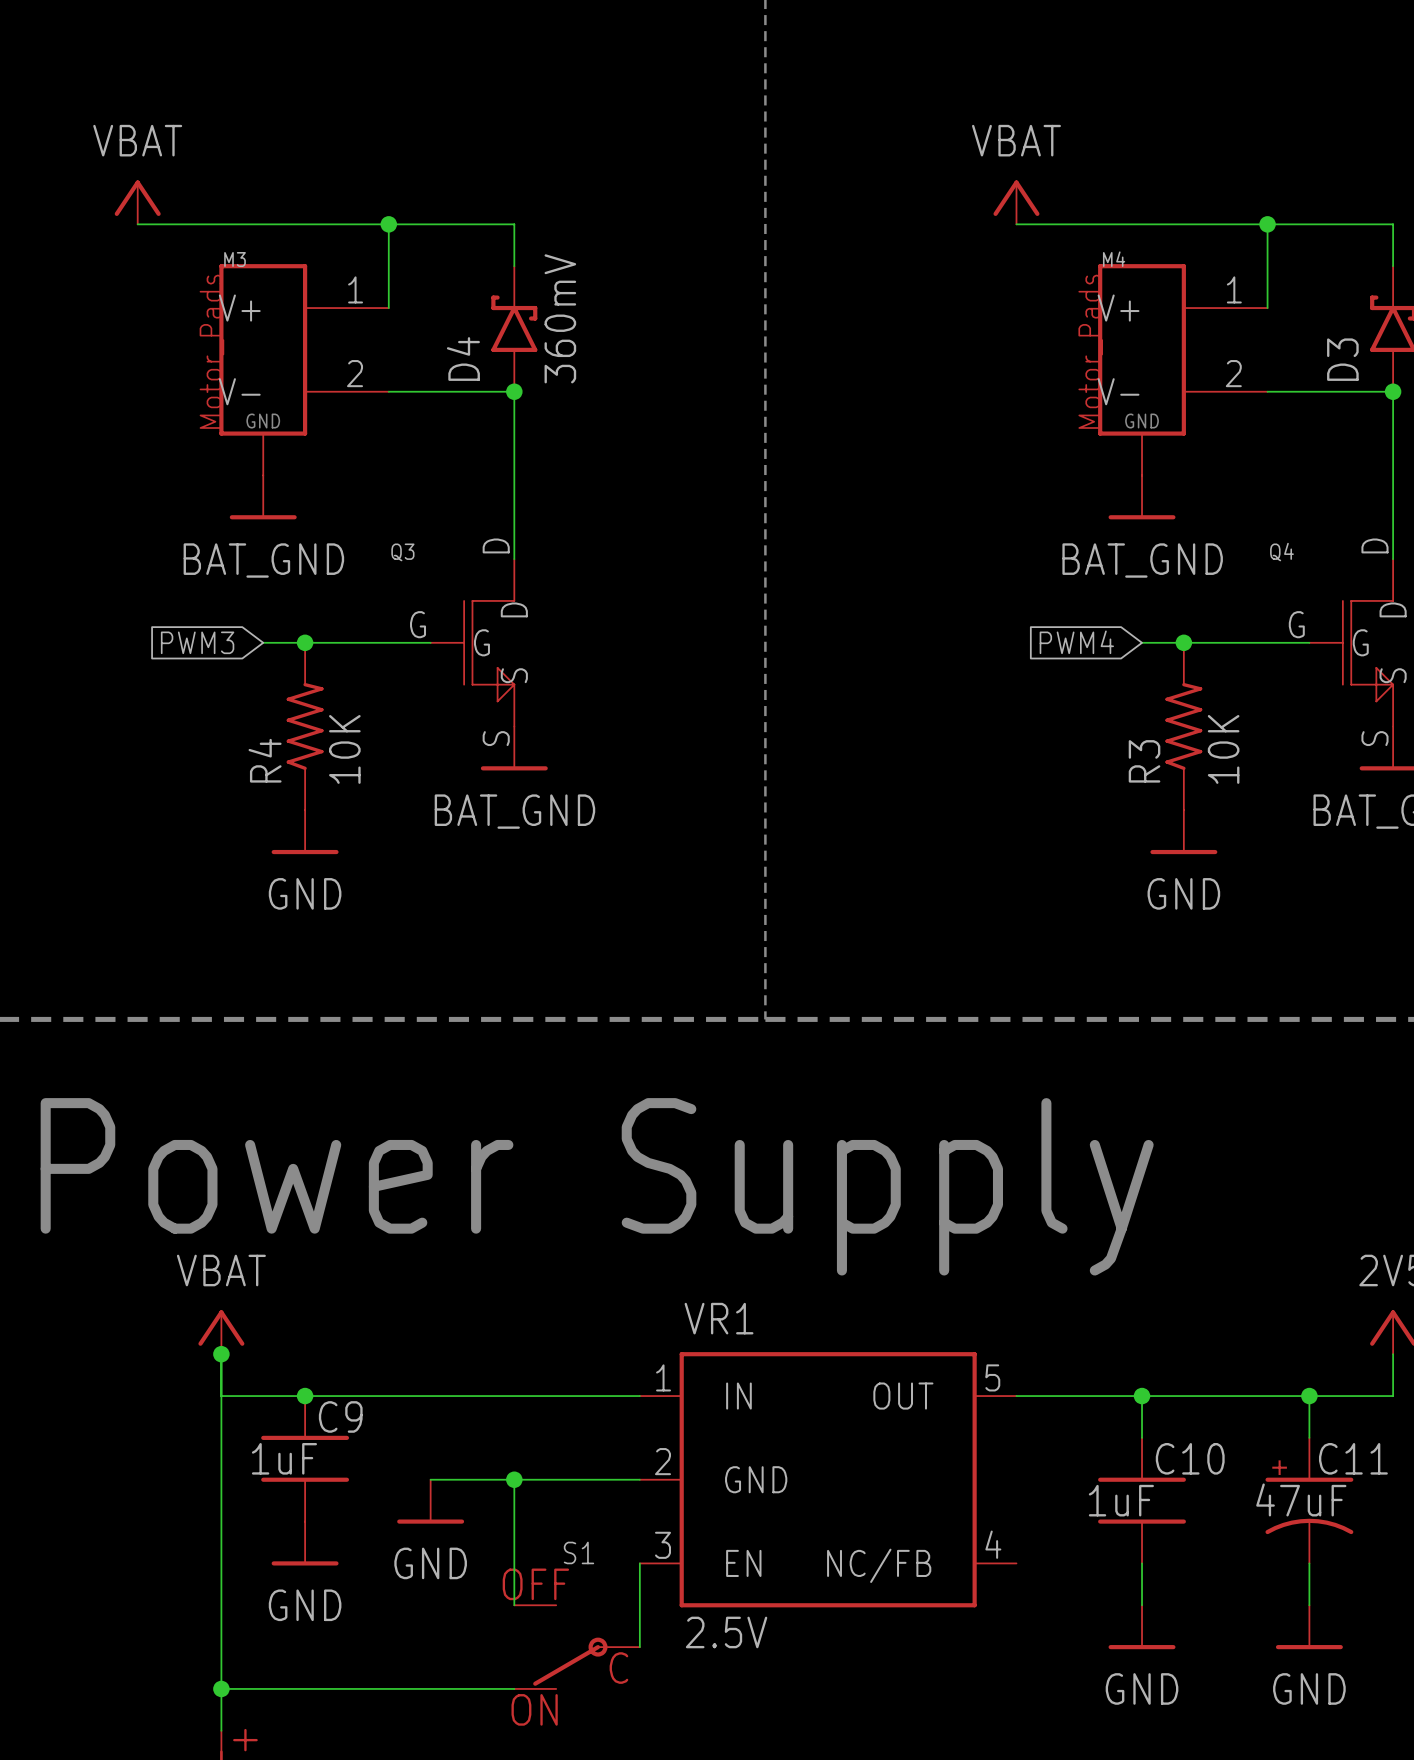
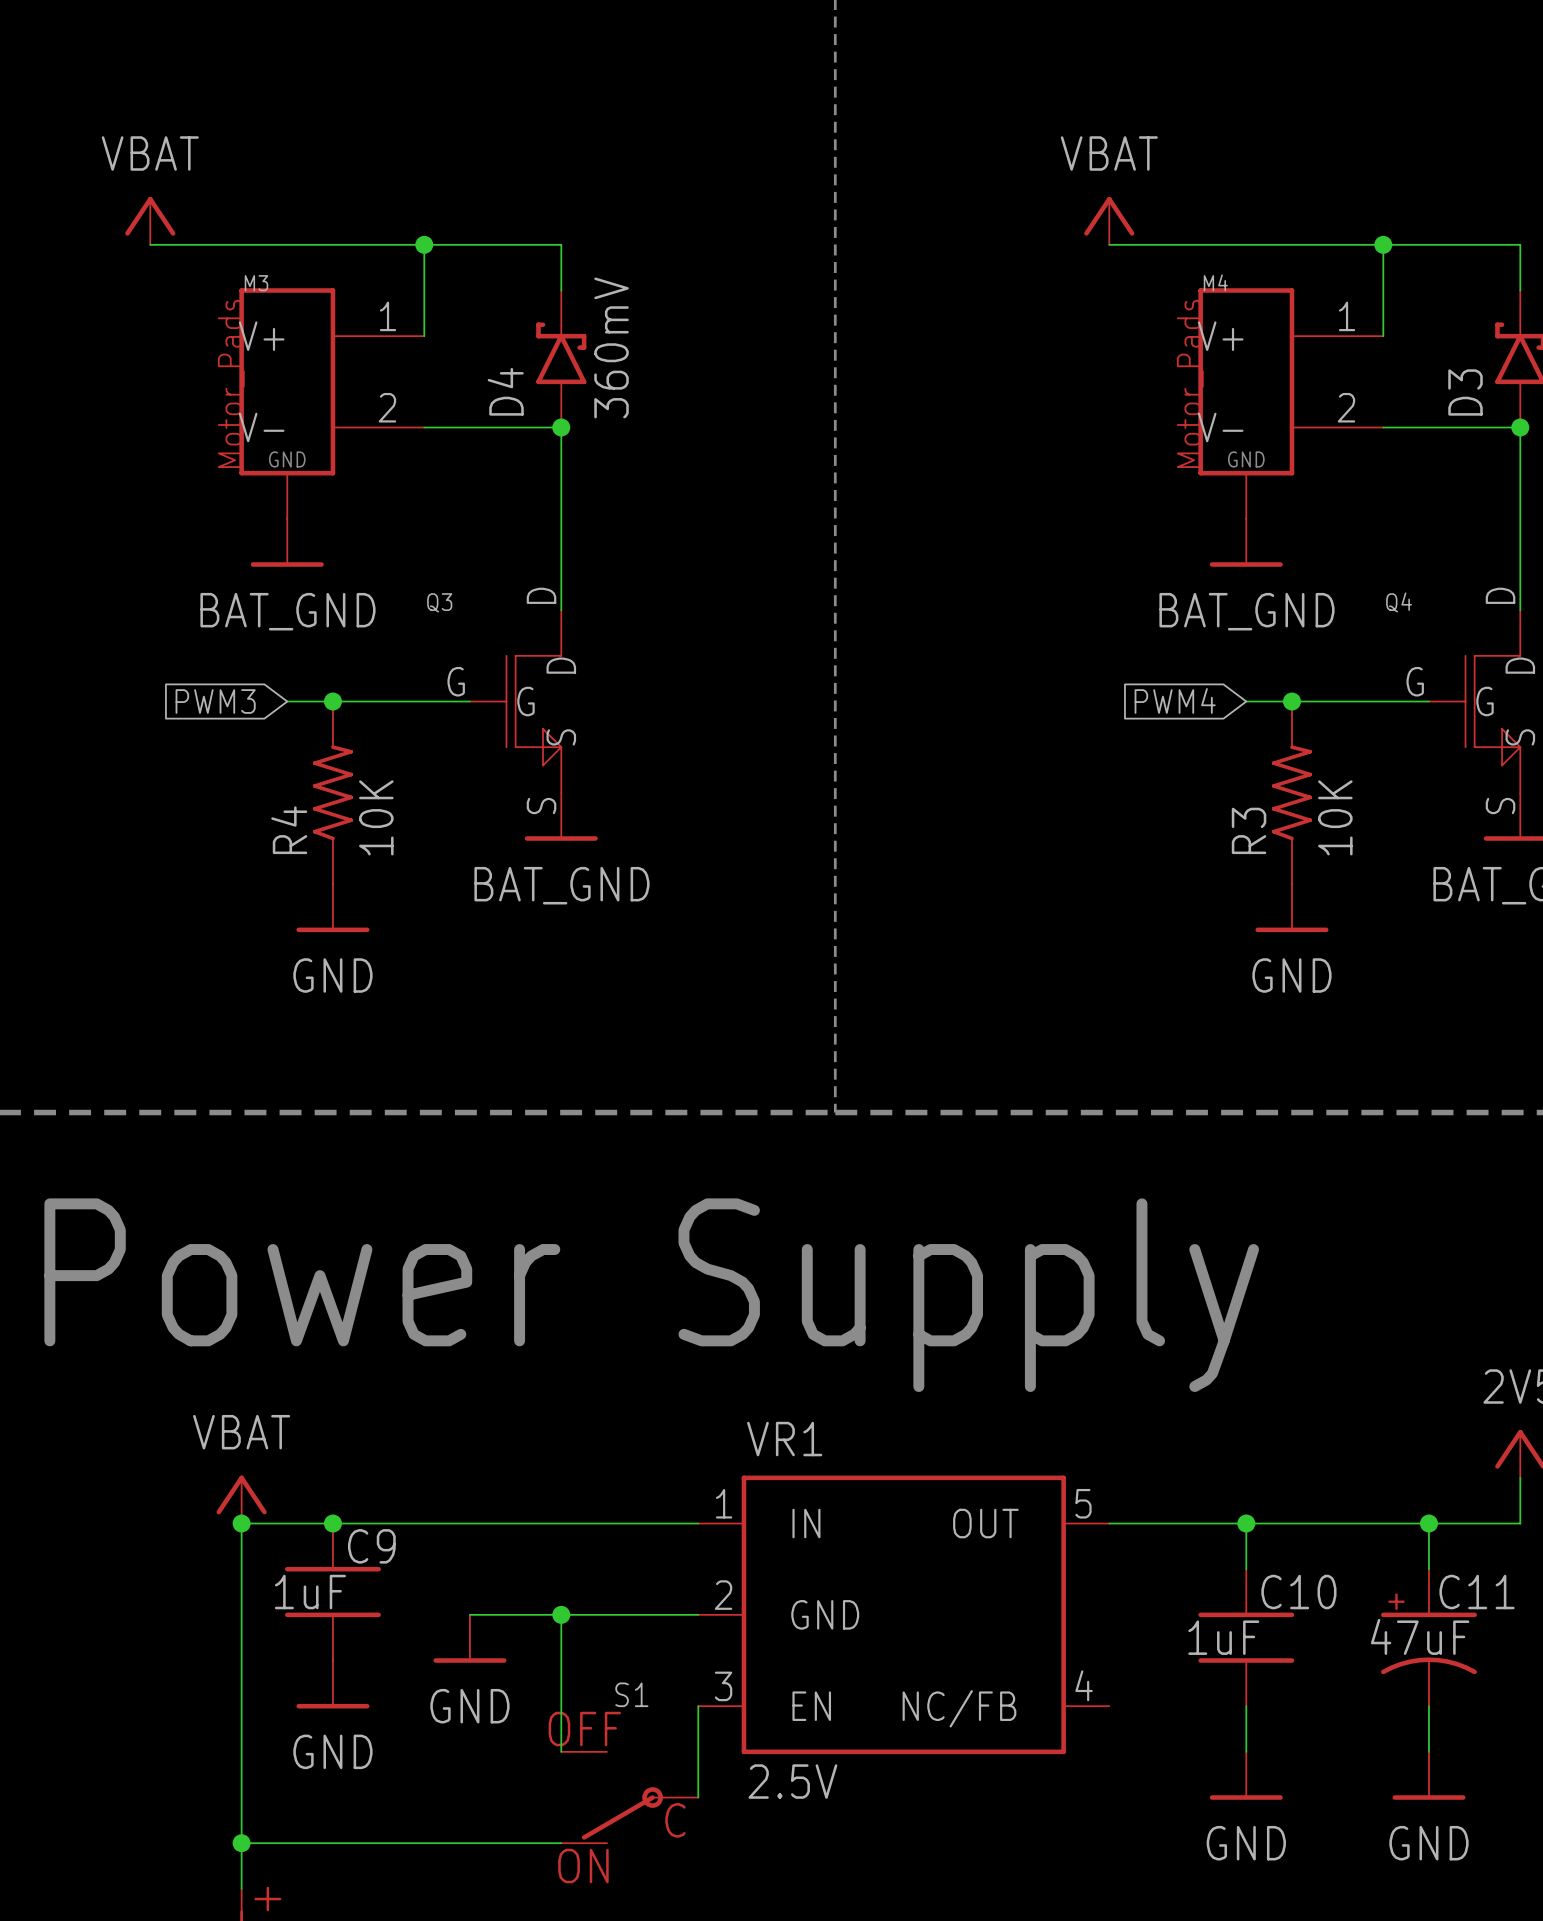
power symbol position: VBAT (221, 1332) -> VBAT (241, 1499)
junction position: (221, 1354) -> (241, 1523)

